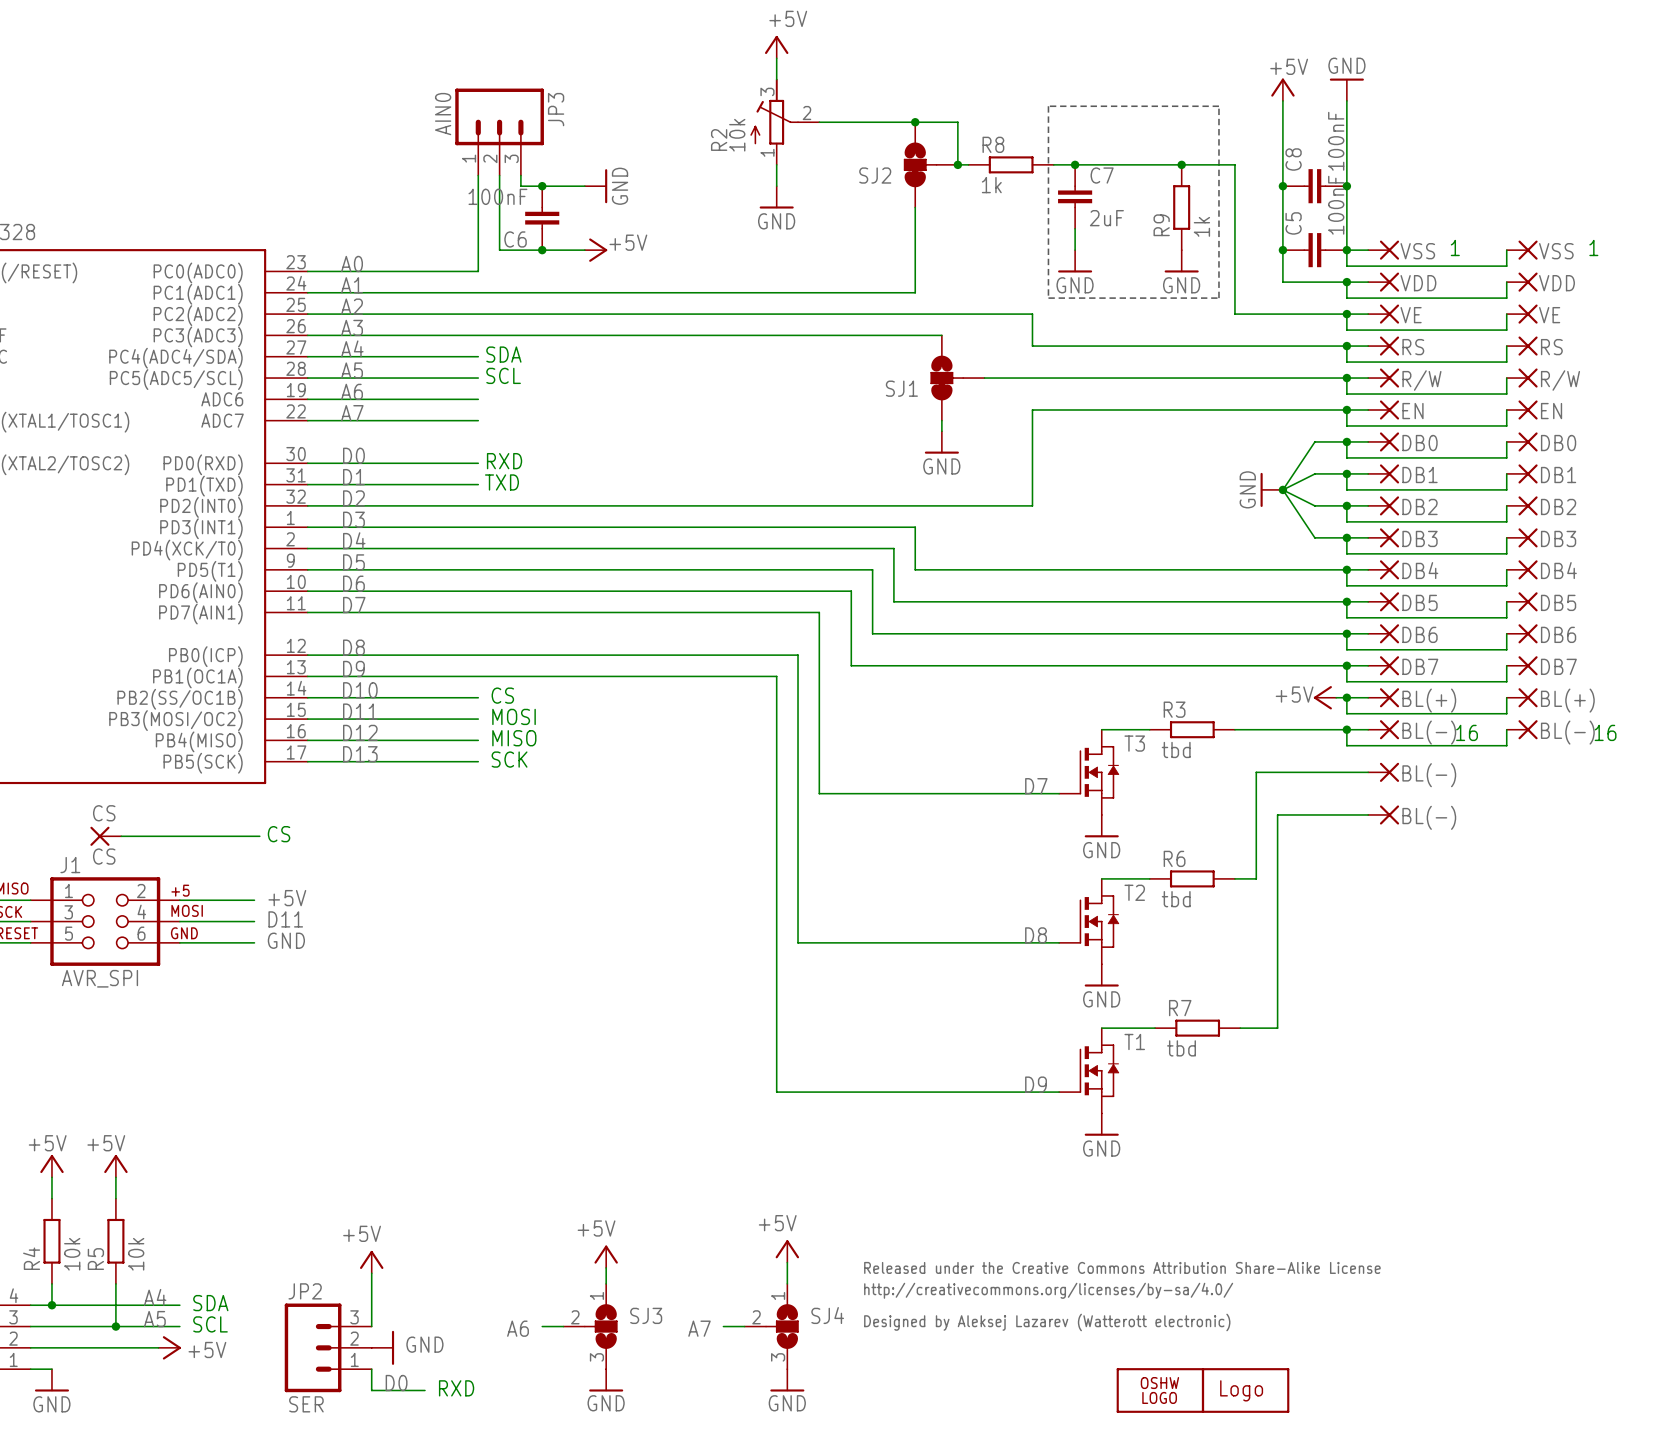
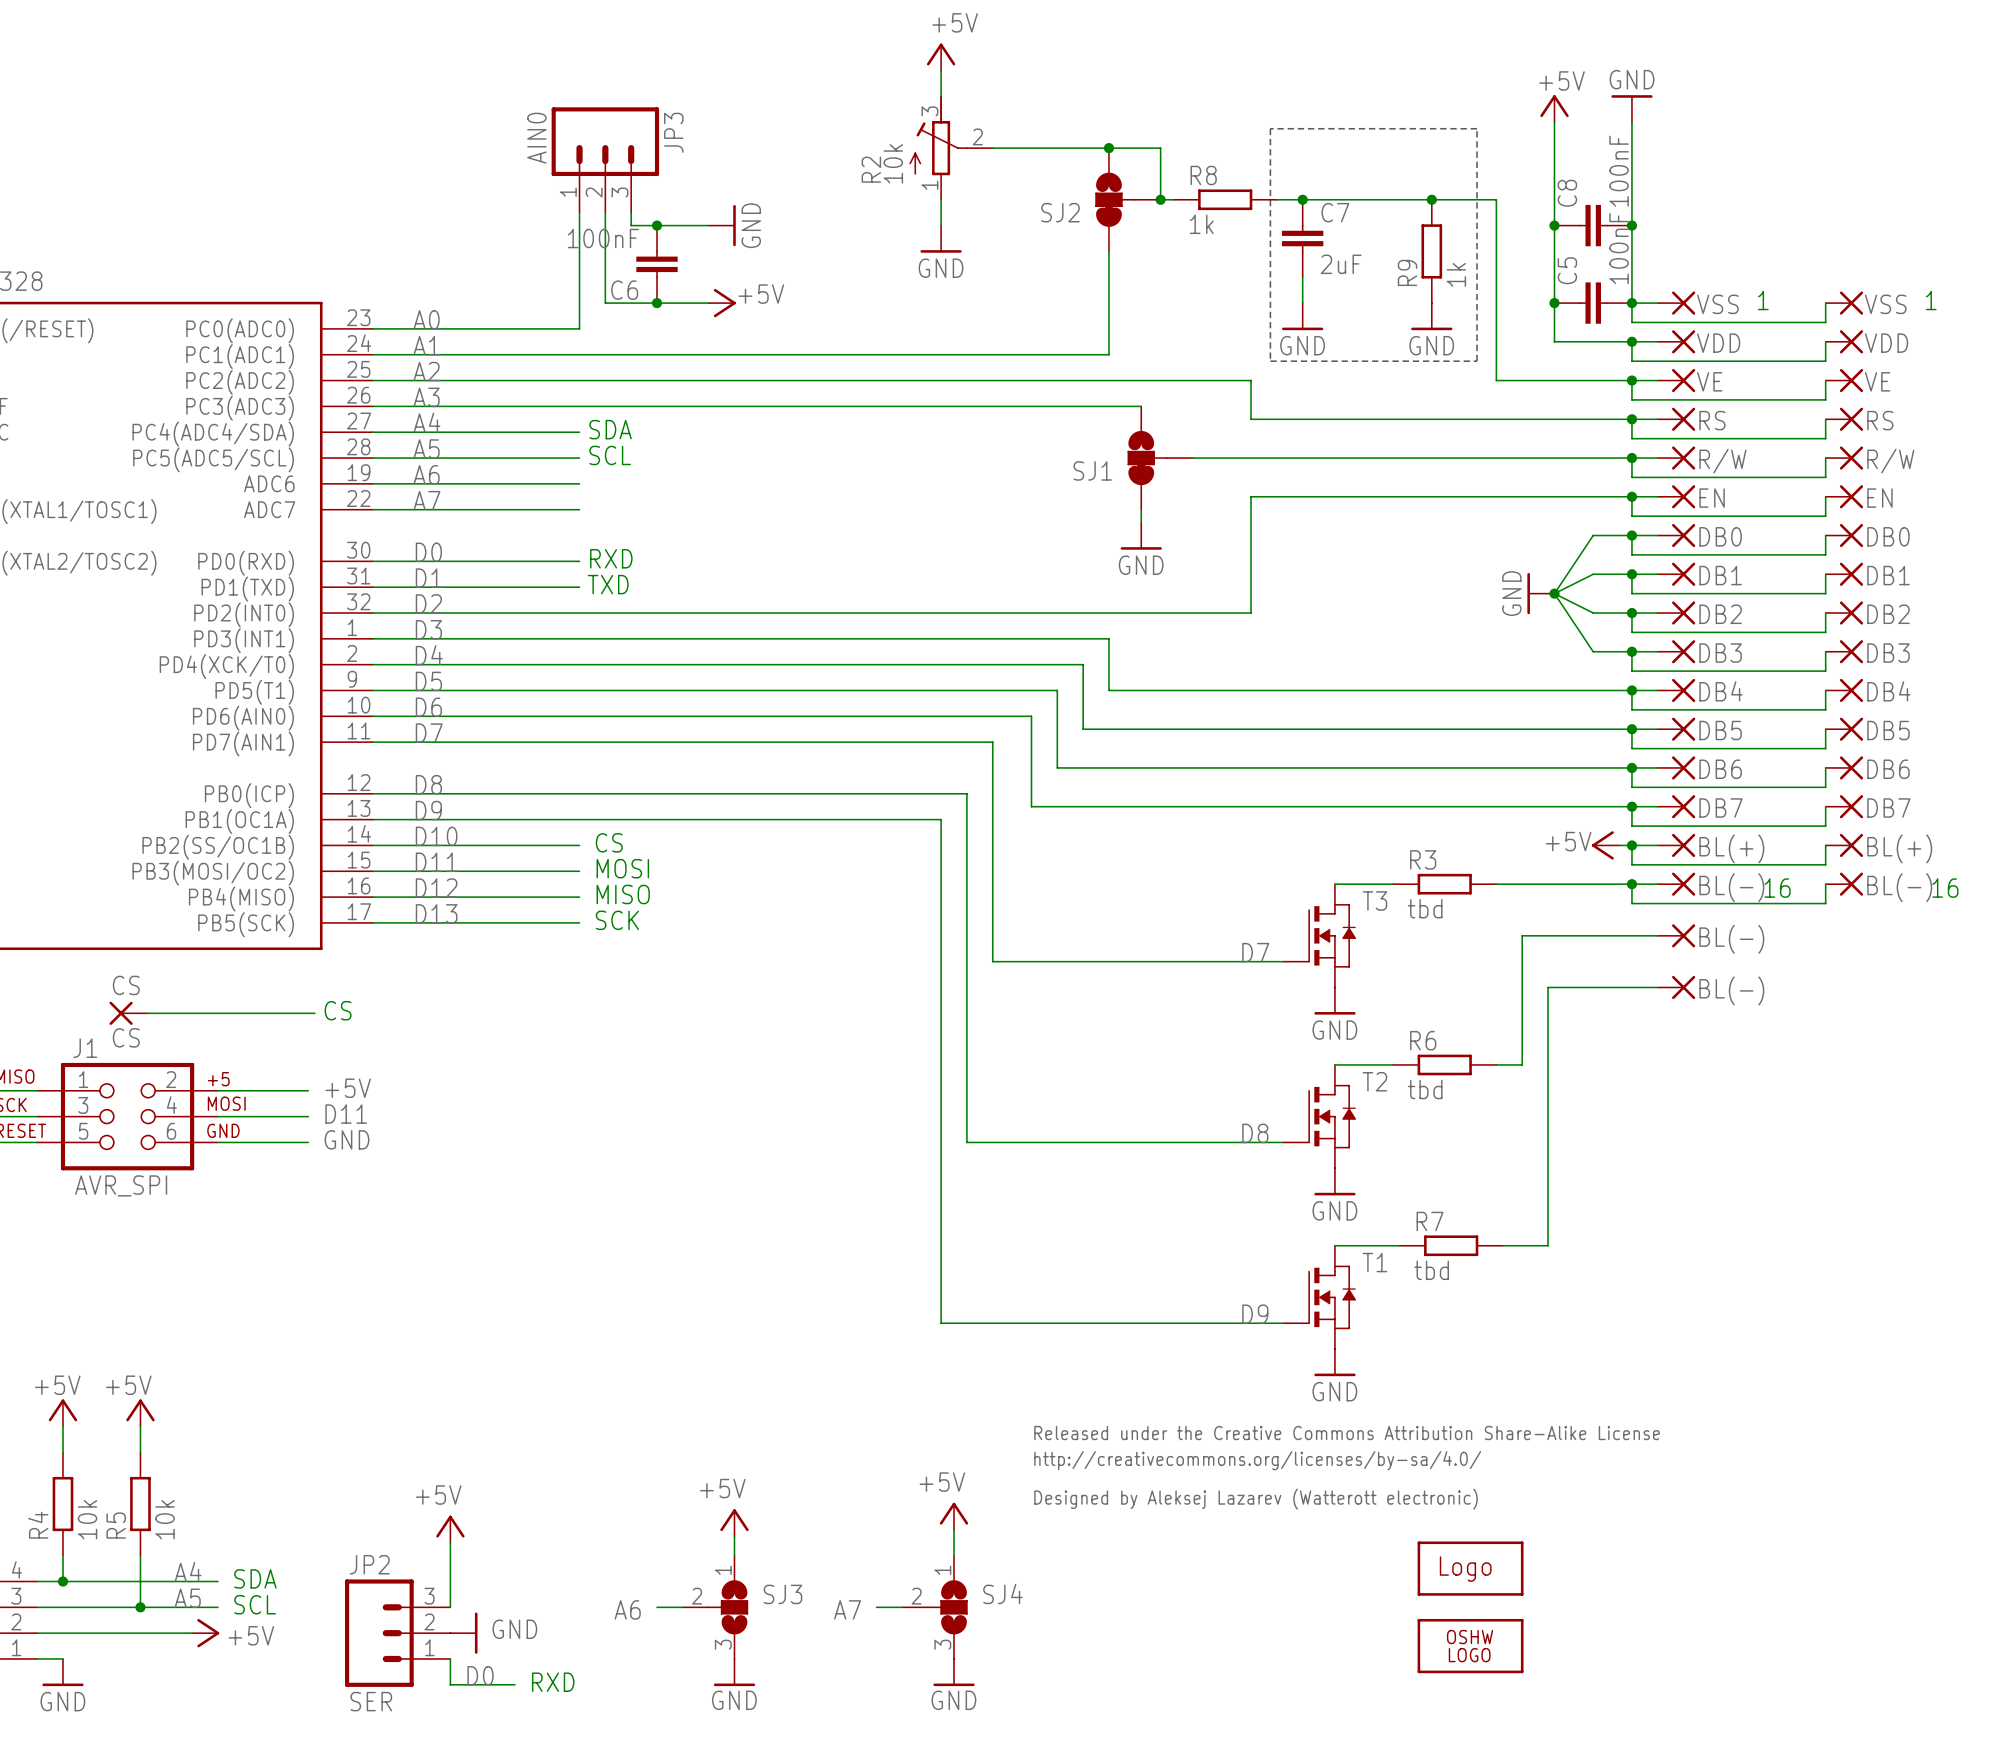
text position: Released under the Creative Commons Attribution Share-Alike License (1122, 1267) -> Released under the Creative Commons Attribution Share-Alike License (1347, 1433)
text position: http://creativecommons.org/licenses/by-sa/4.0/ (1048, 1290) -> http://creativecommons.org/licenses/by-sa/4.0/ (1257, 1460)
text position: Designed by Aleksej Lazarev (Watterott electronic) (1047, 1322) -> Designed by Aleksej Lazarev (Watterott electronic) (1256, 1499)
part position: (1160, 1390) -> (1470, 1646)
part position: (1245, 1390) -> (1470, 1568)

